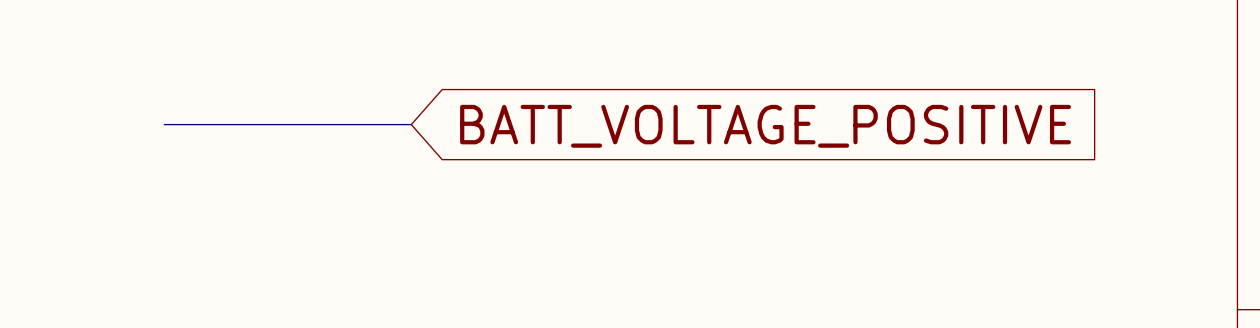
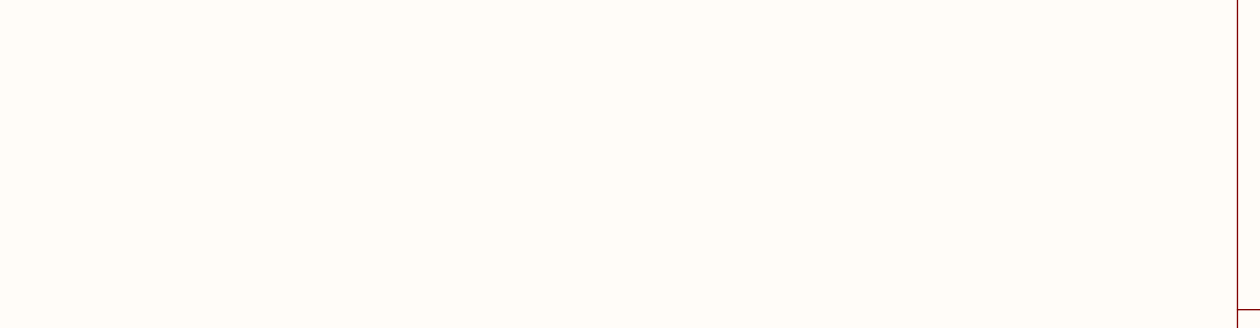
wire: (164, 124) (411, 124) -> none
global label: BATT_VOLTAGE_POSITIVE (765, 126) -> none

